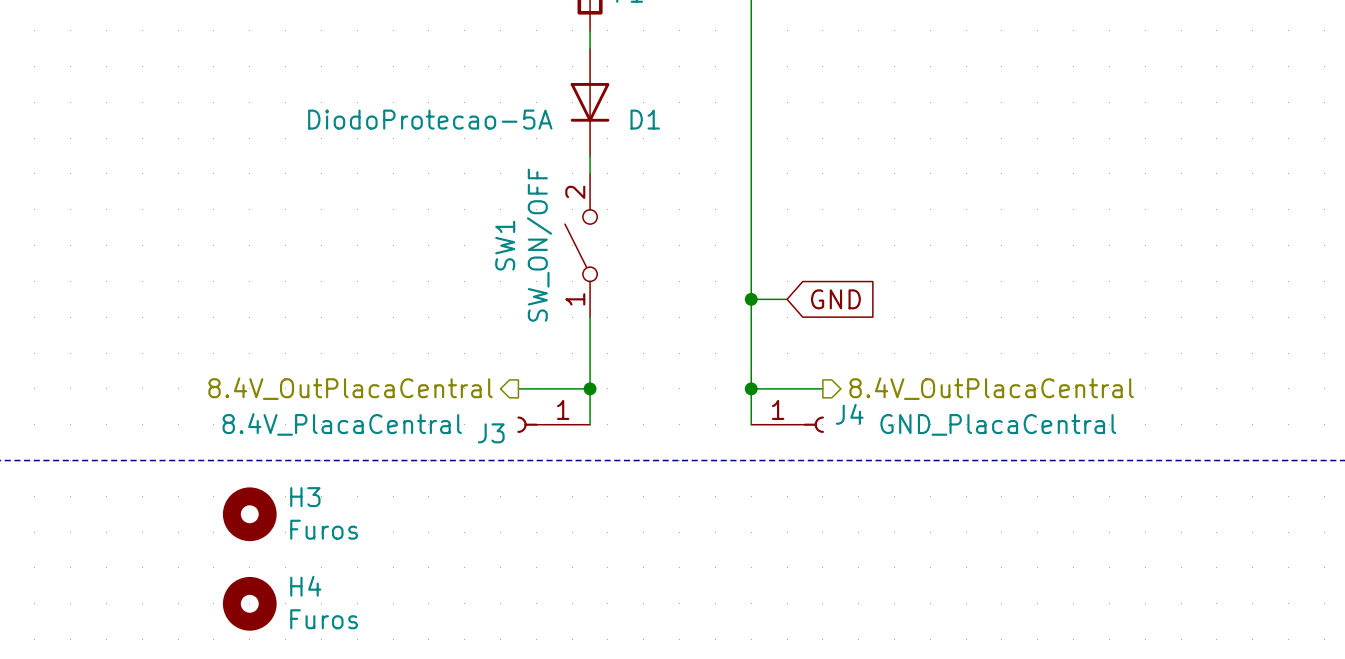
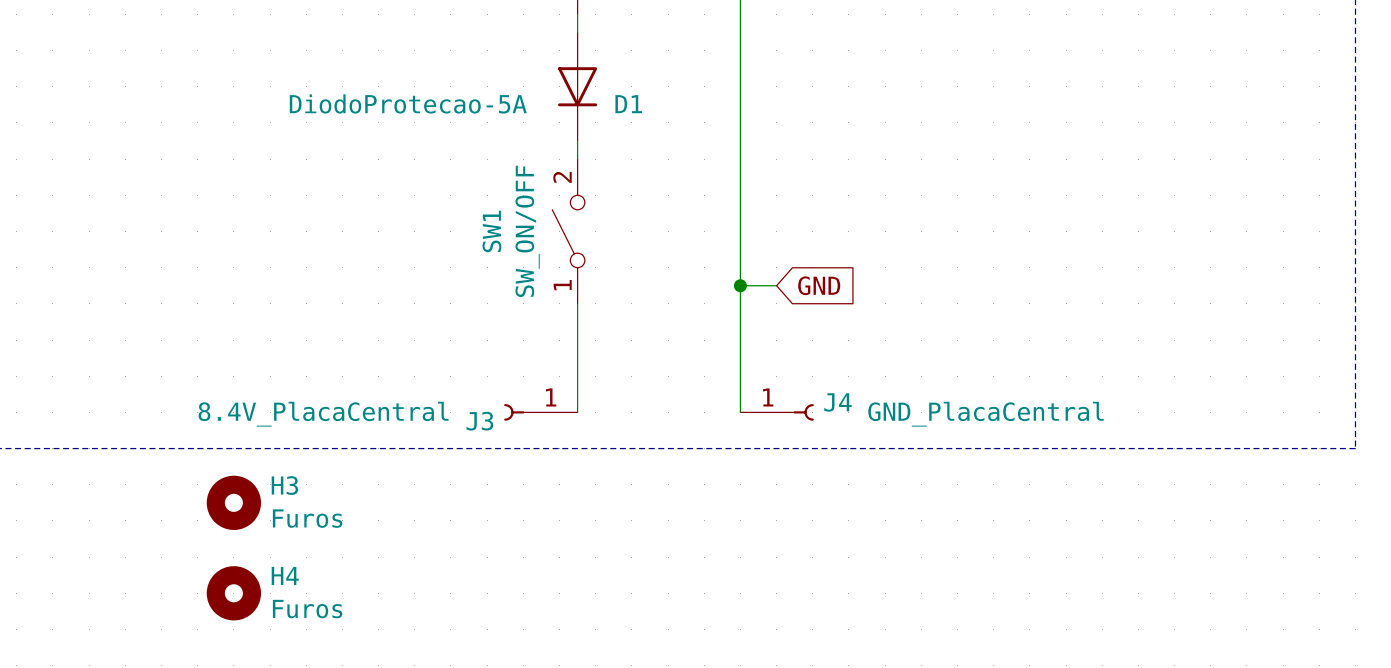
hierarchical label: 8.4V_OutPlacaCentral (350, 388) -> none
wire: (518, 388) (590, 388) -> none
junction: (590, 388) -> none
wire: (751, 388) (822, 388) -> none
junction: (751, 388) -> none
hierarchical label: 8.4V_OutPlacaCentral (991, 388) -> none

